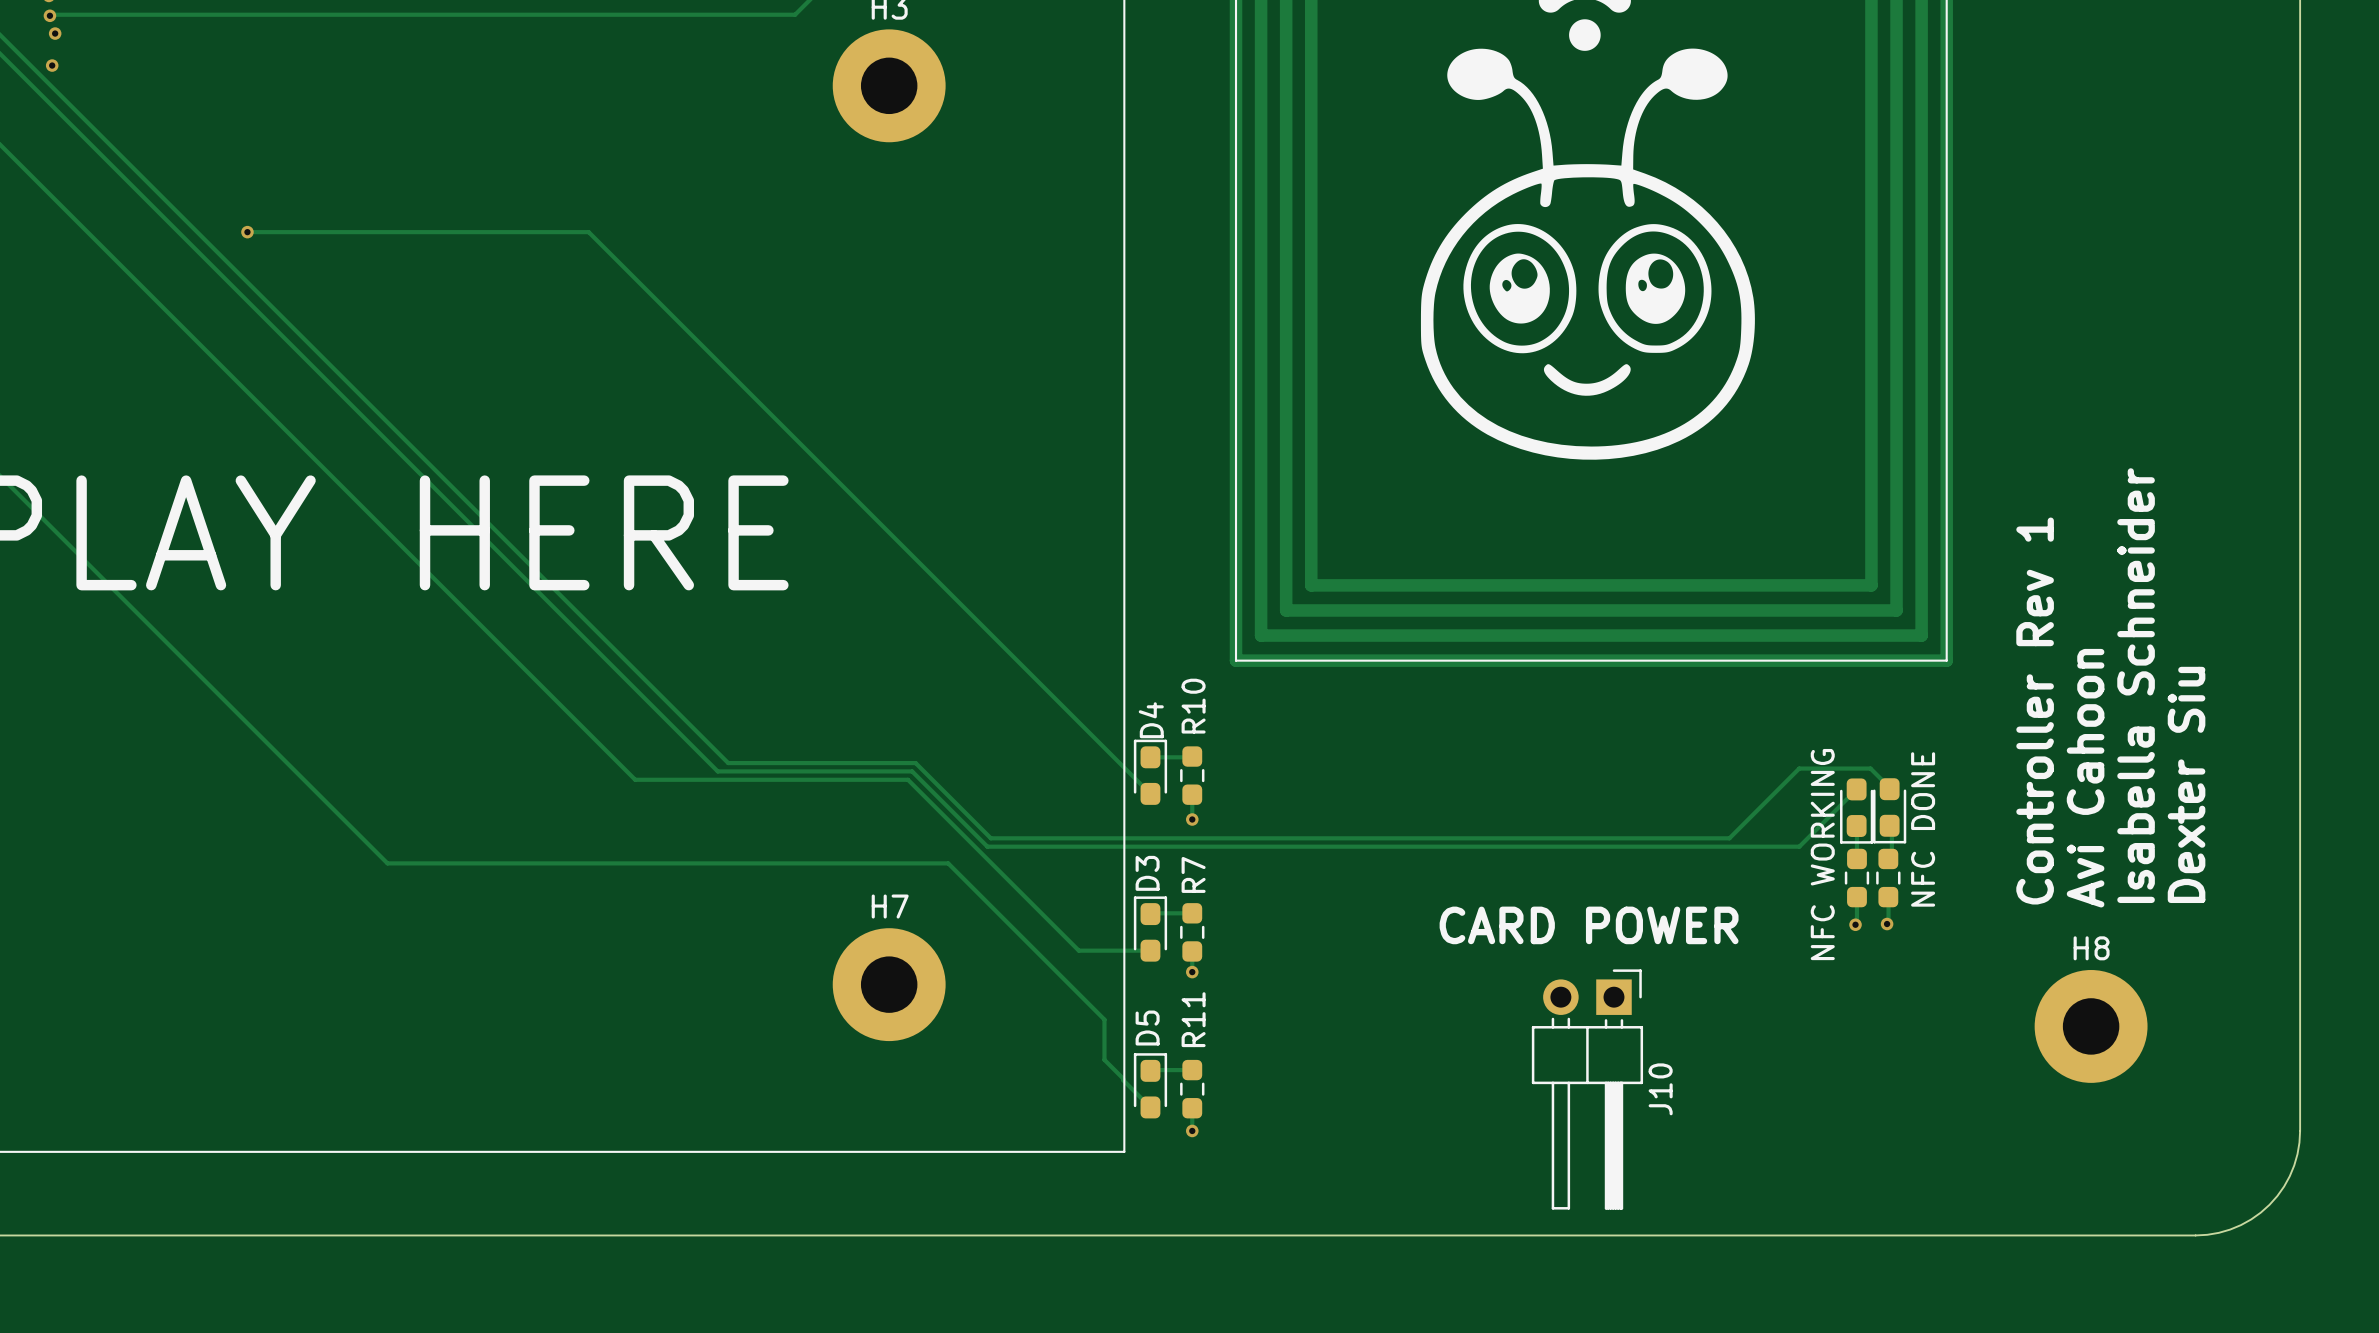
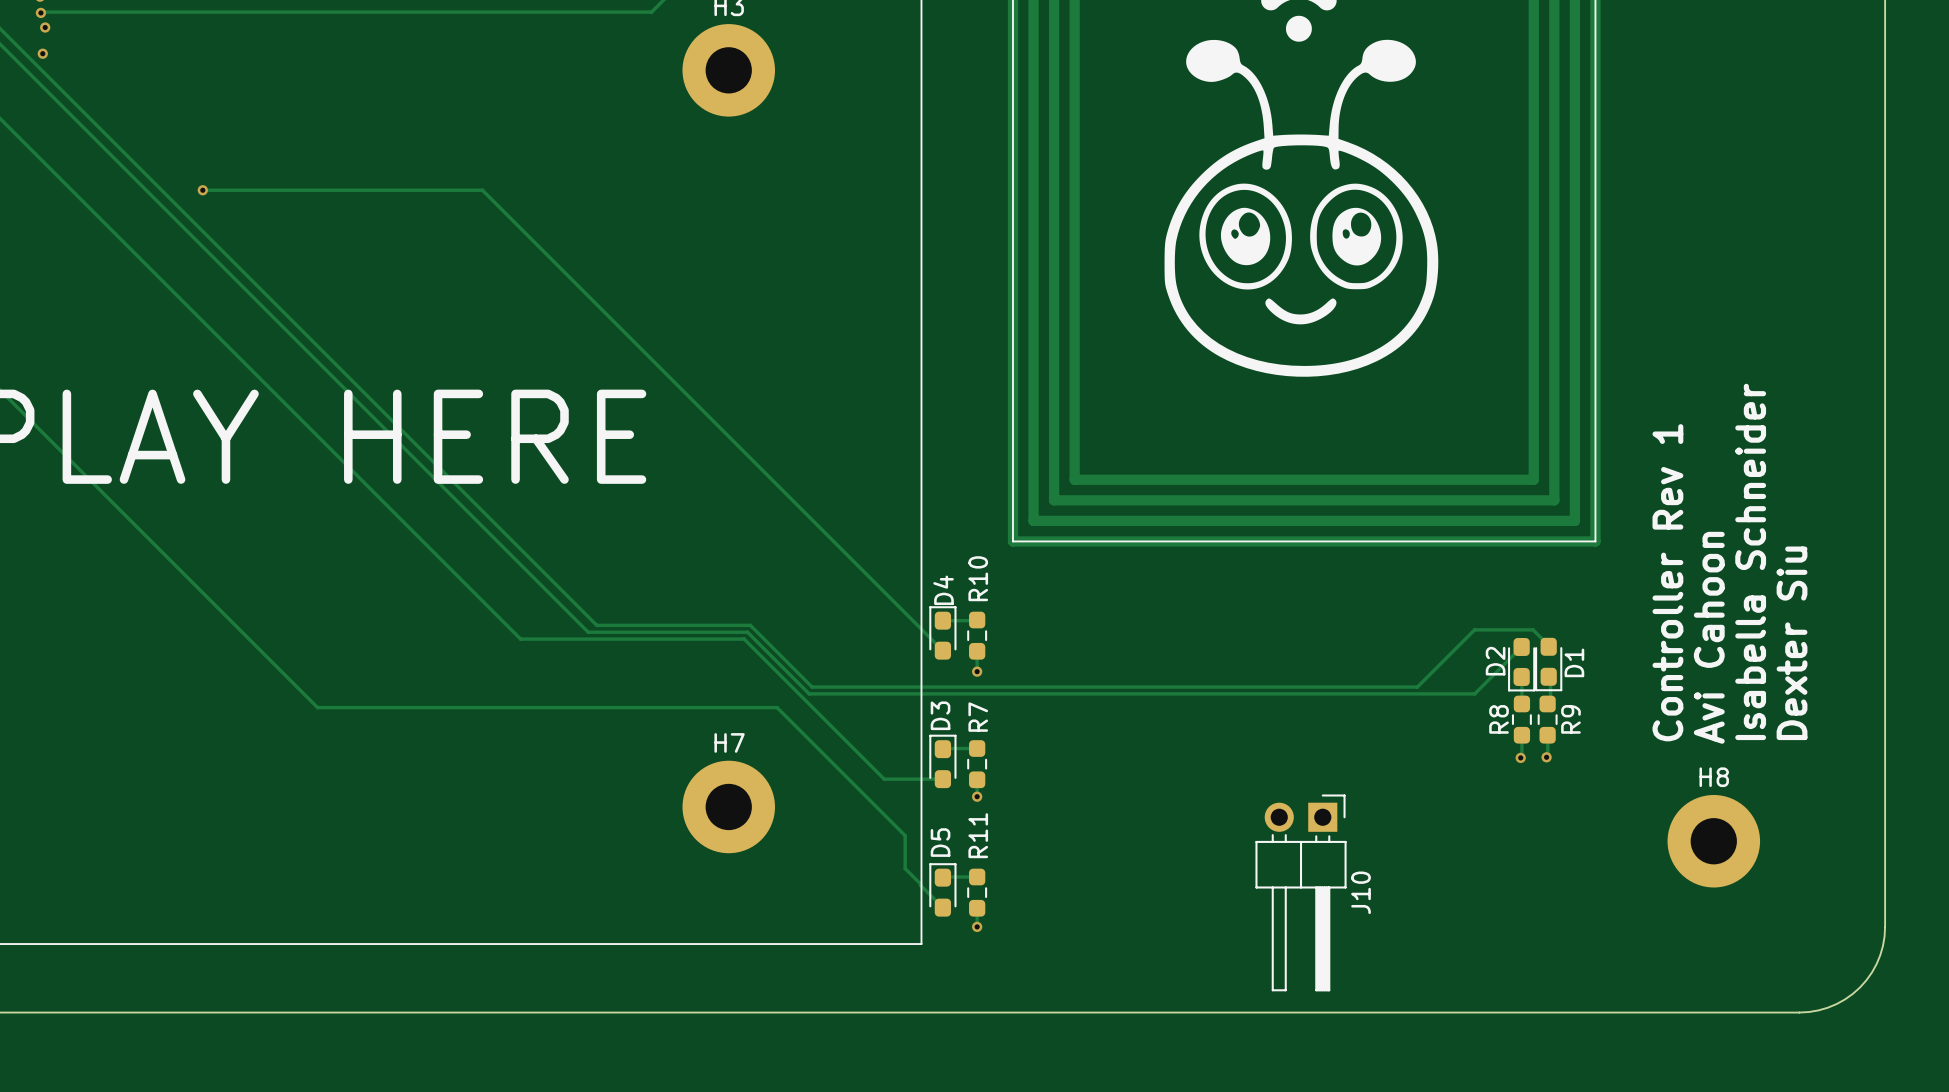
NFC DONE name: NFC DONE (1923, 829) -> D1 (1574, 662)
NFC WORKING name: NFC WORKING (1822, 854) -> D2 (1495, 661)
R8 name: none -> R8 (1499, 719)
R9 name: none -> R9 (1570, 719)
text: CARD POWER (1589, 925) -> none

